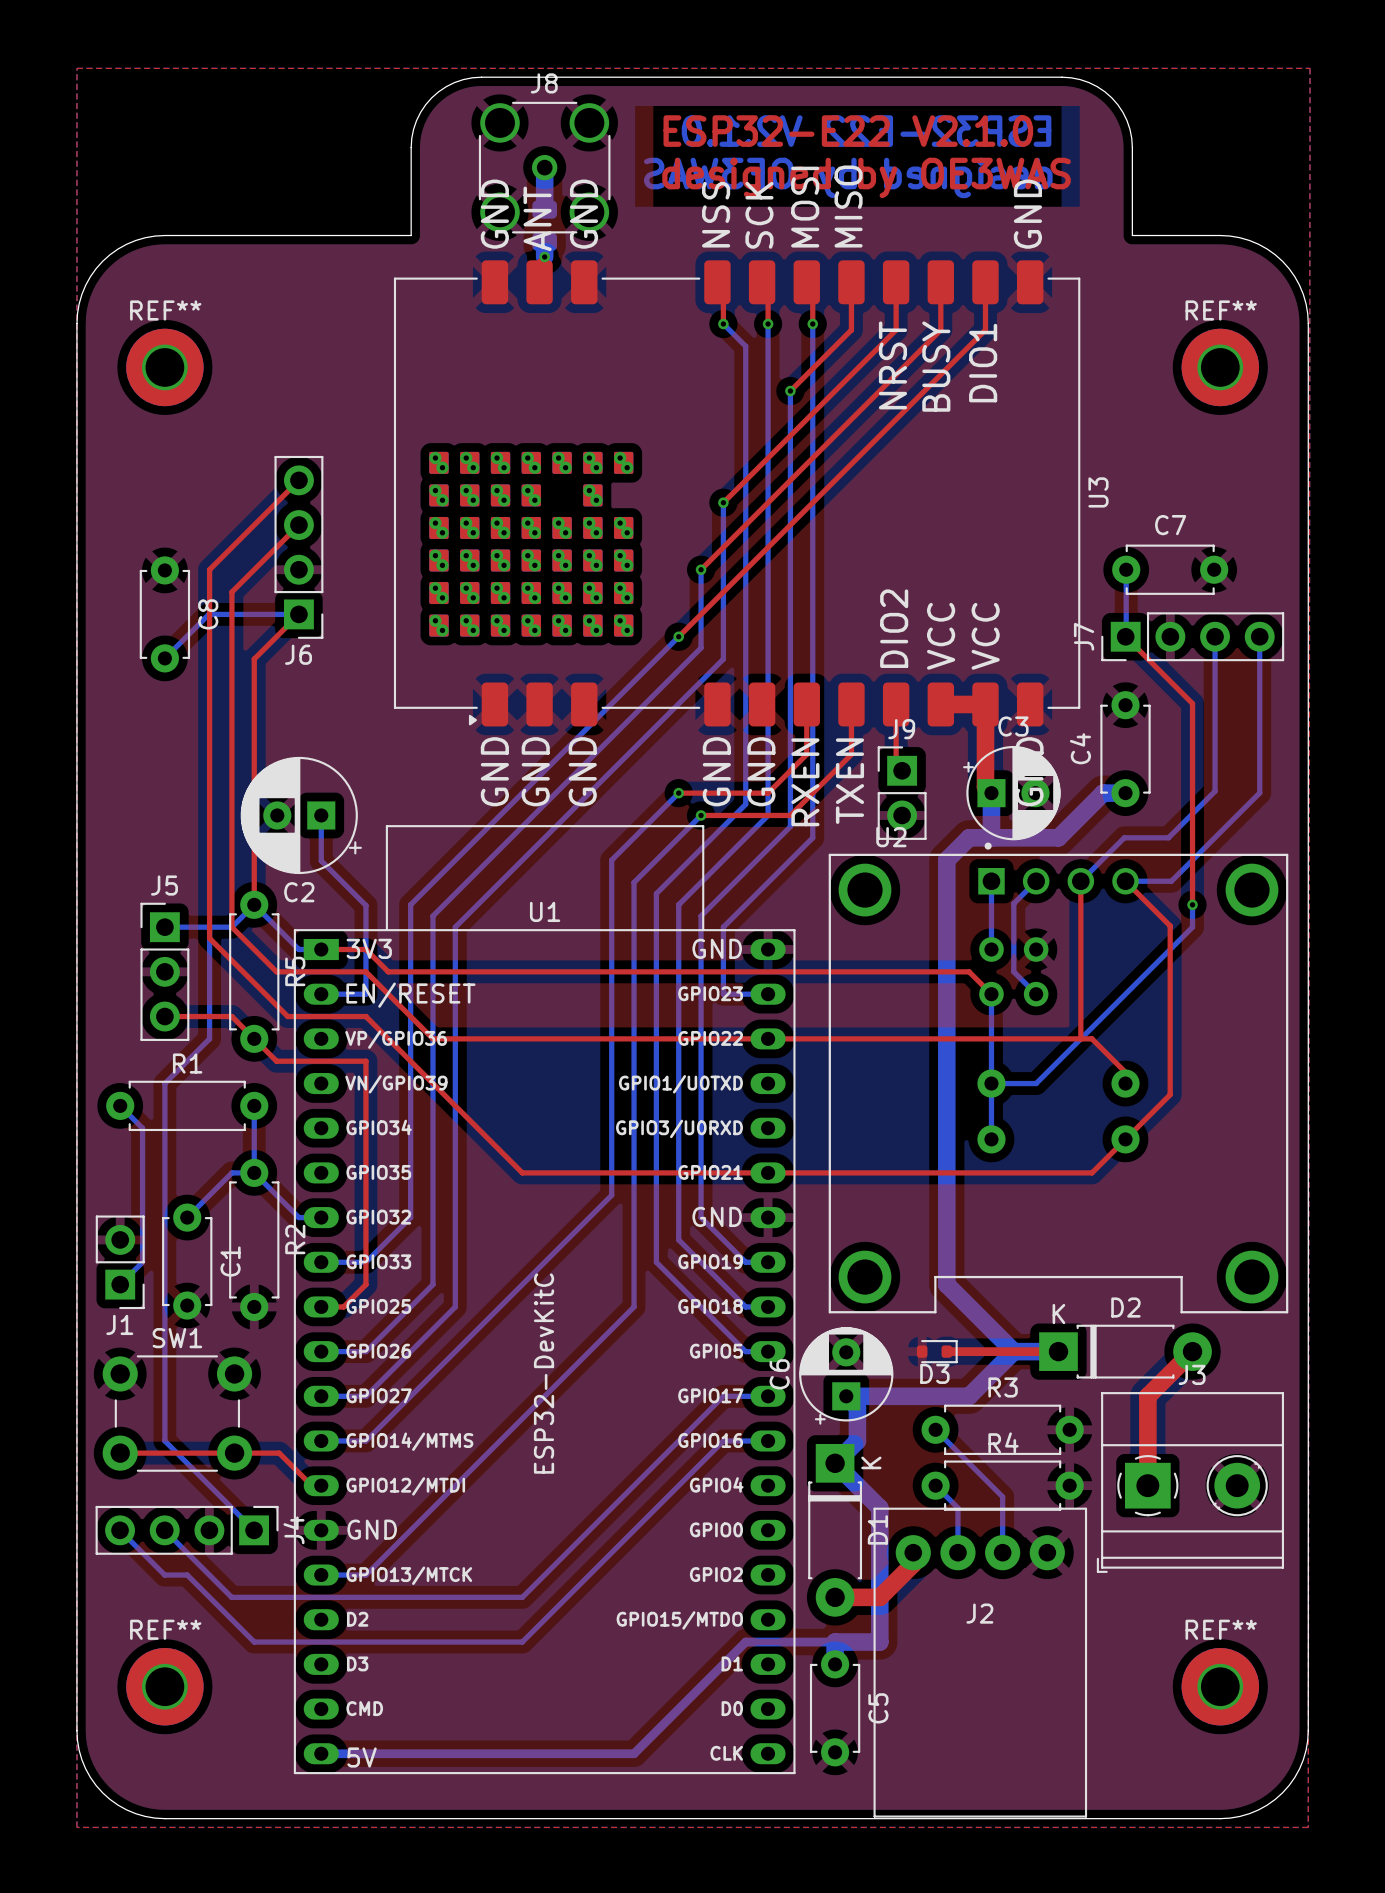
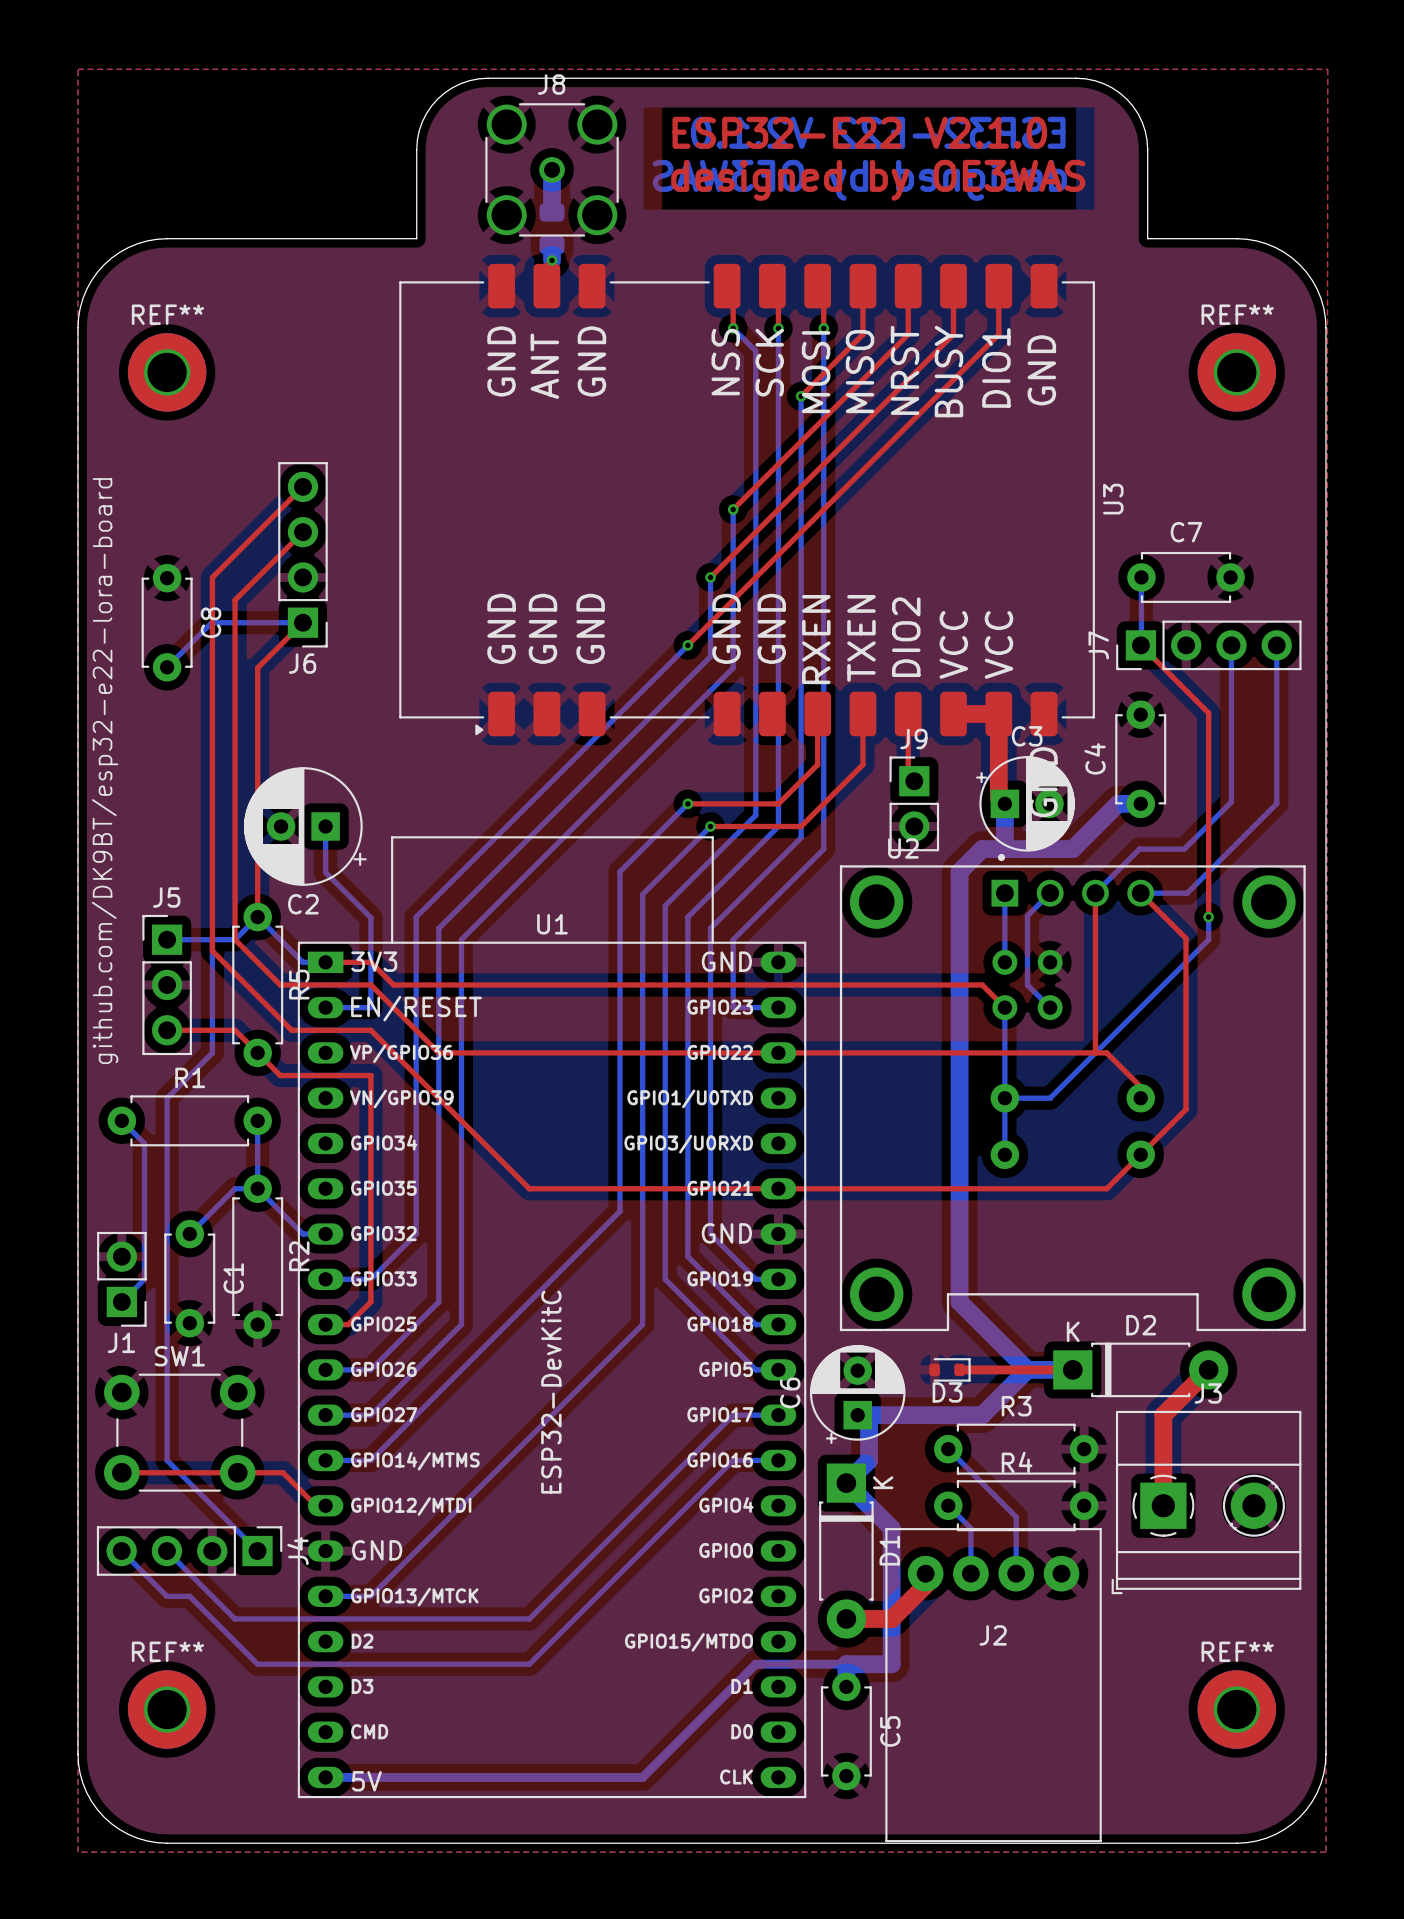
U3 footprint: [393, 260, 1081, 727] -> [399, 263, 1095, 737]
text: none -> github.com/DK9BT/esp32-e22-lora-board (105, 771)

